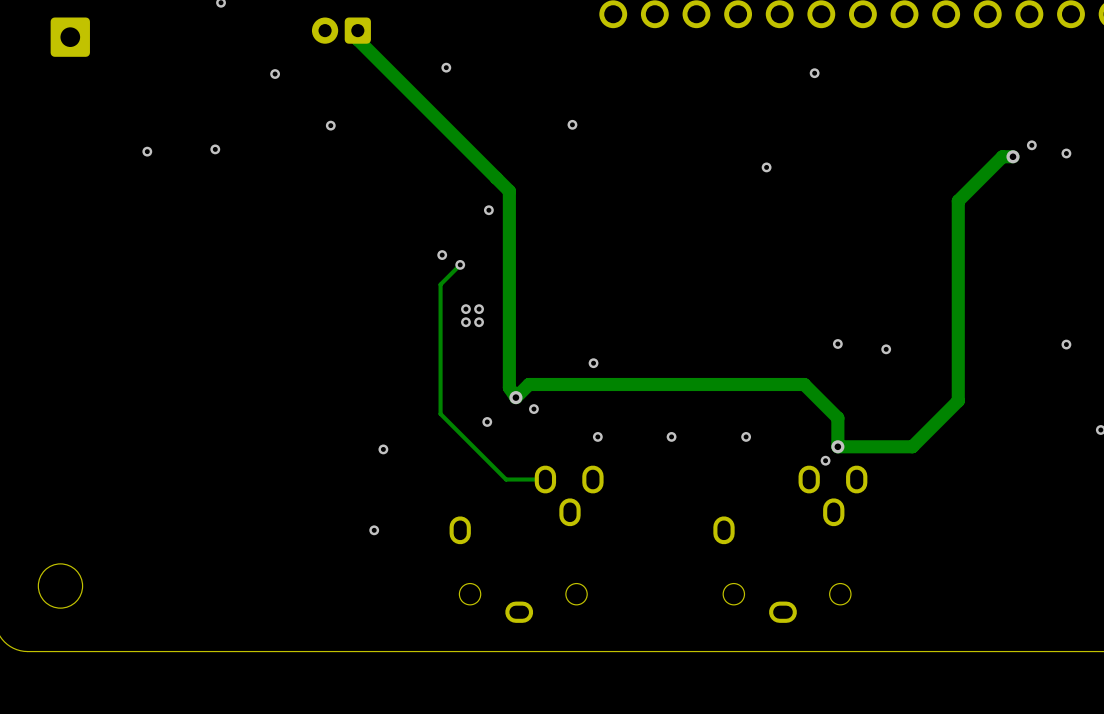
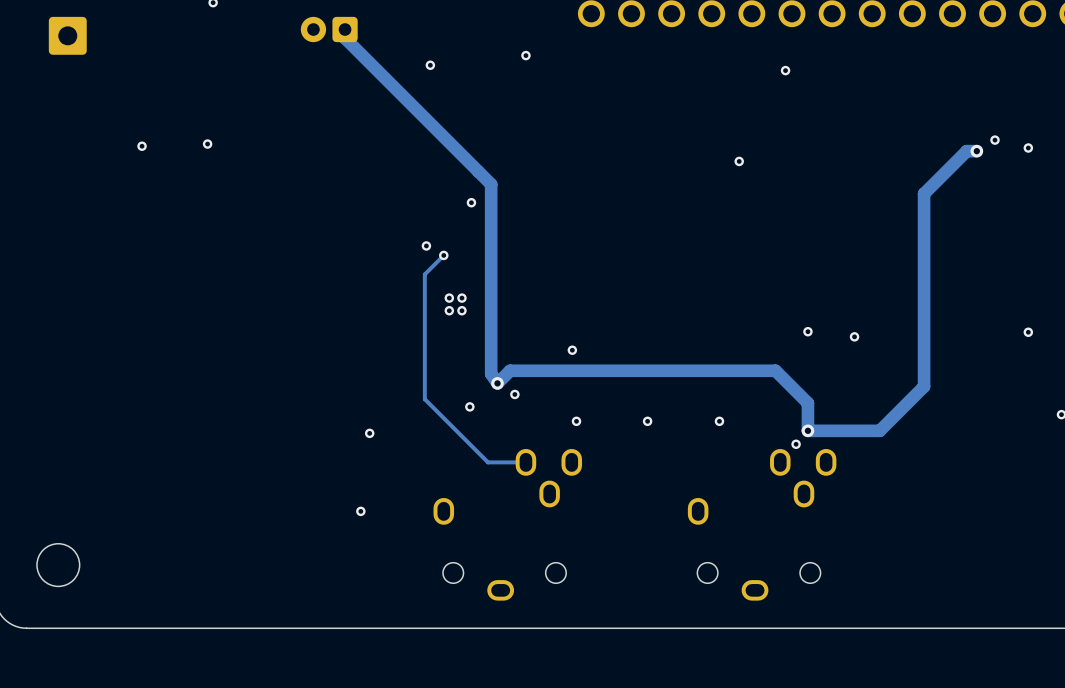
via: none -> (525, 55)
via: (275, 74) -> none
via: (572, 124) -> none
via: (330, 125) -> none

